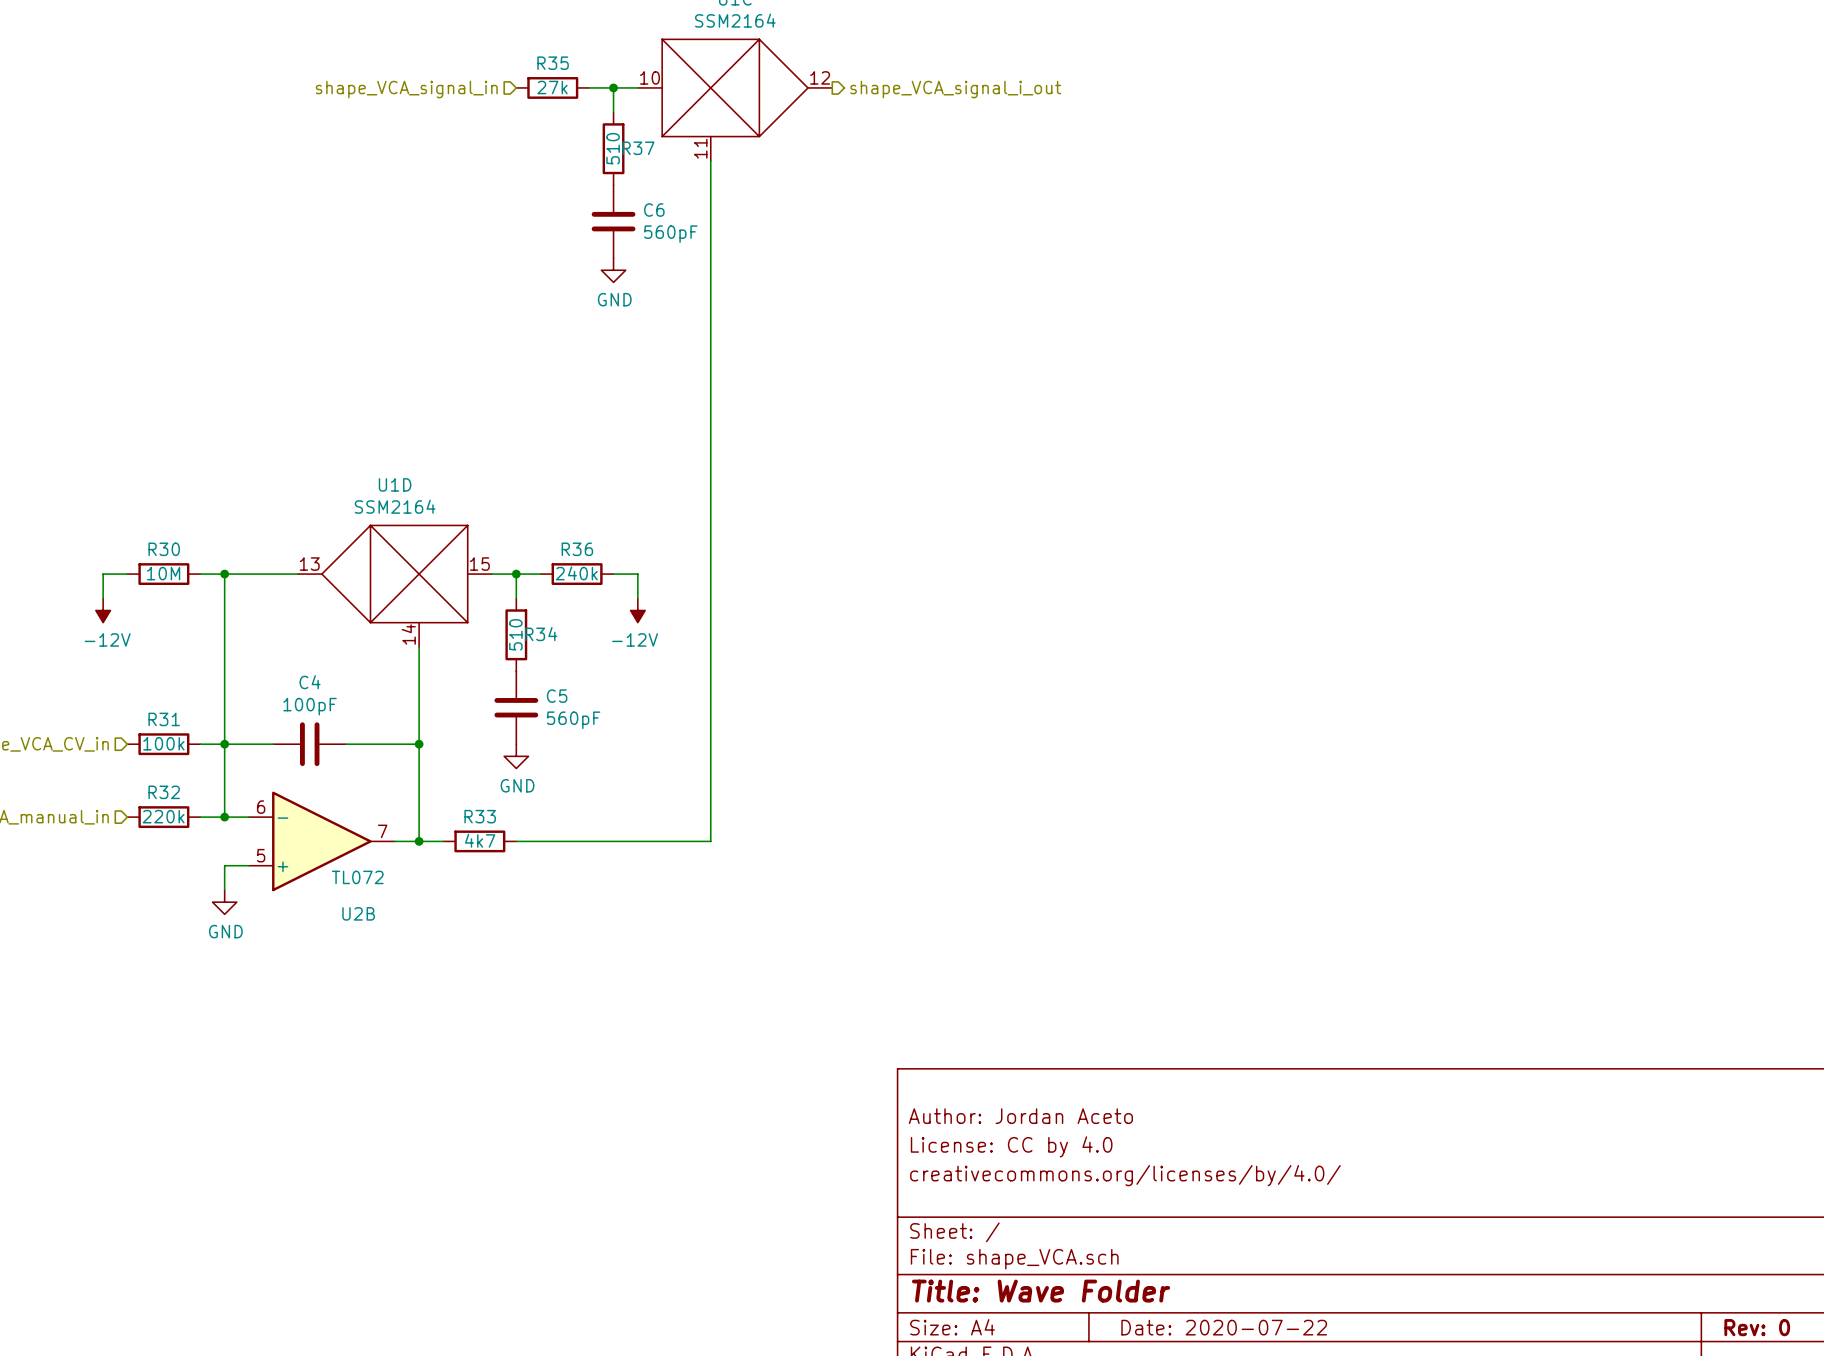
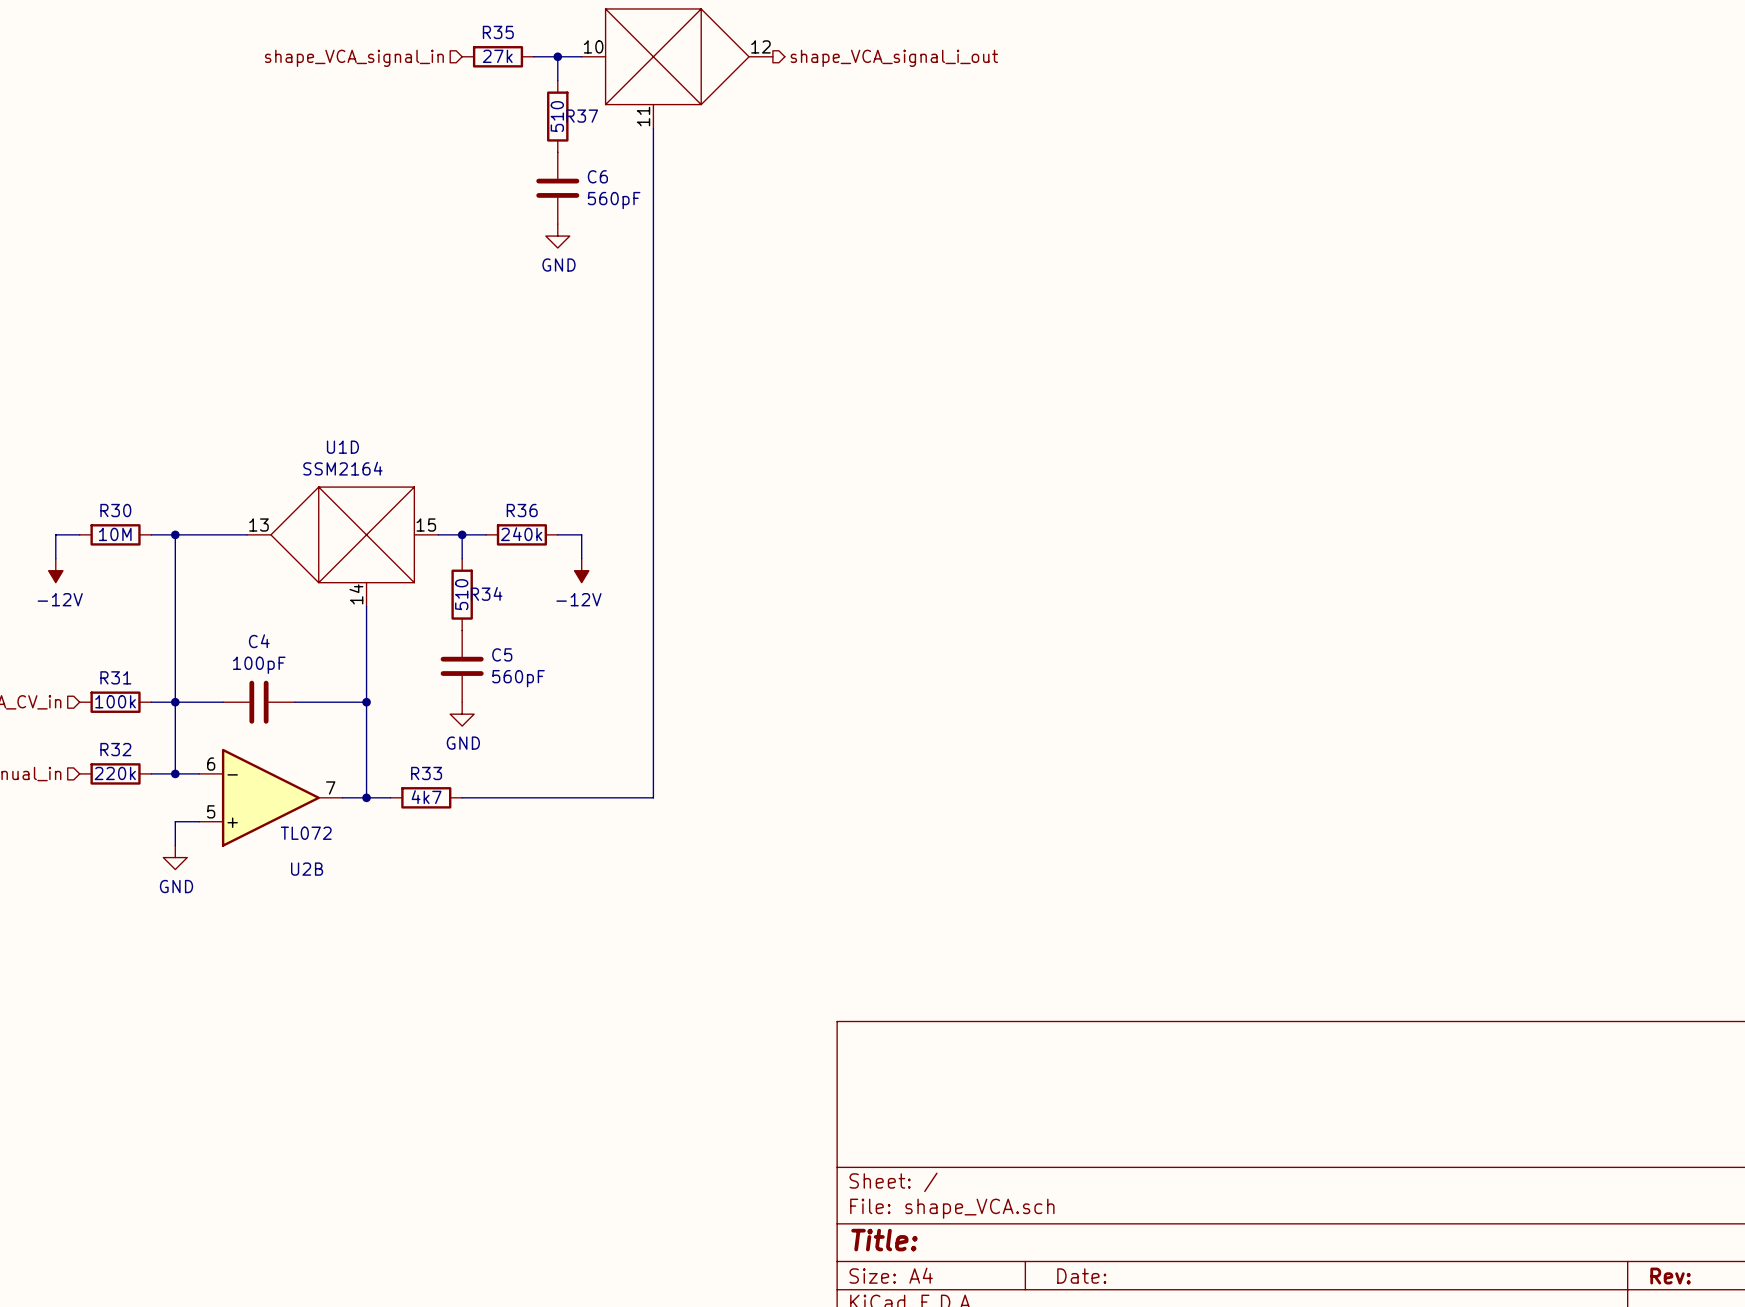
title block: Author: Jordan Aceto (1020, 1116) -> none
title block: License: CC by 4.0 (1011, 1146) -> none
title block: creativecommons.org/licenses/by/4.0/ (1125, 1175) -> none
title block: Title: Wave Folder (1041, 1291) -> Title: (884, 1240)
title block: Date: 2020-07-22 (1224, 1327) -> Date: (1081, 1276)
title block: Rev: 0 (1757, 1327) -> Rev: (1670, 1276)

